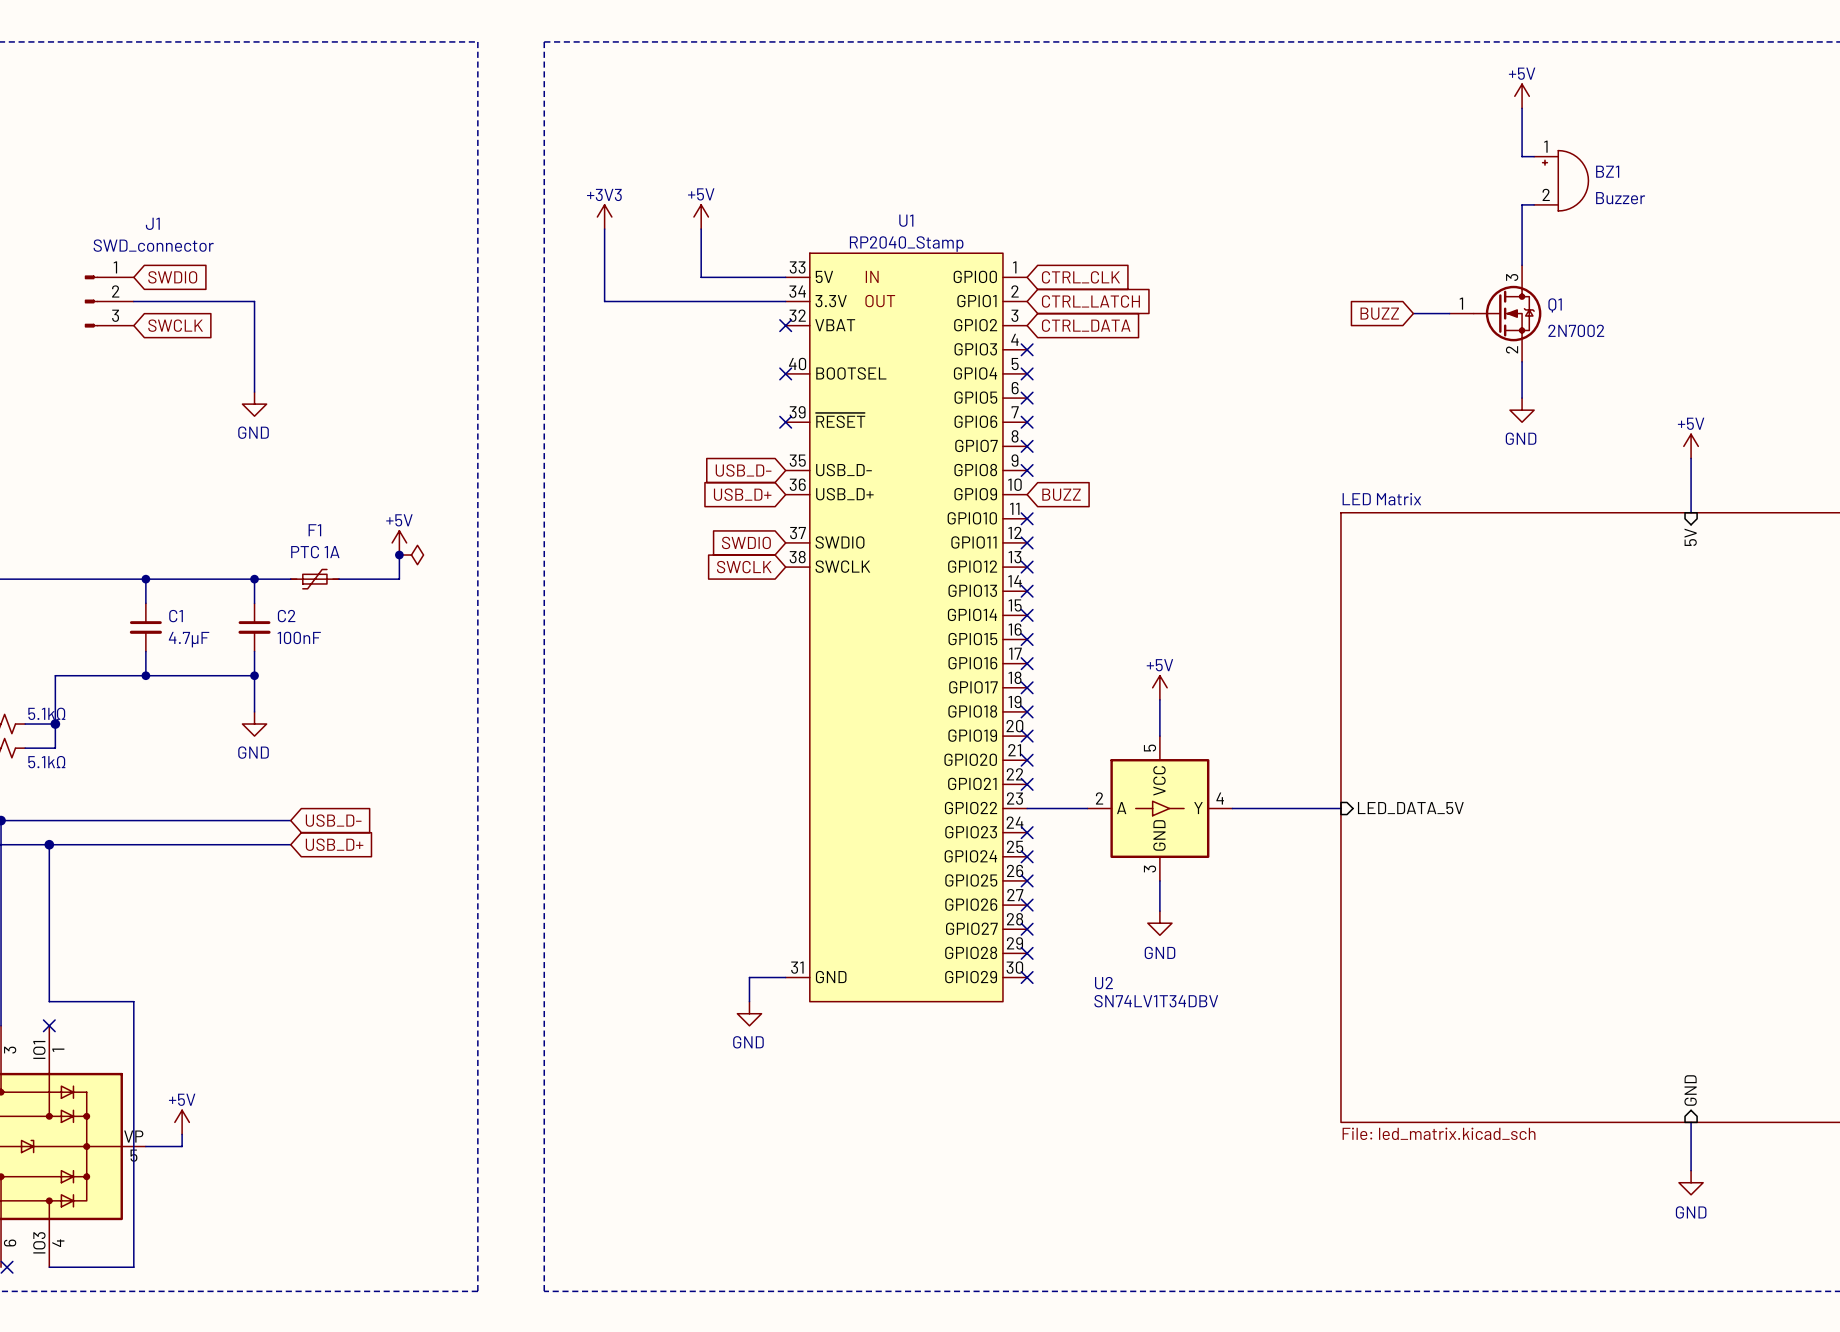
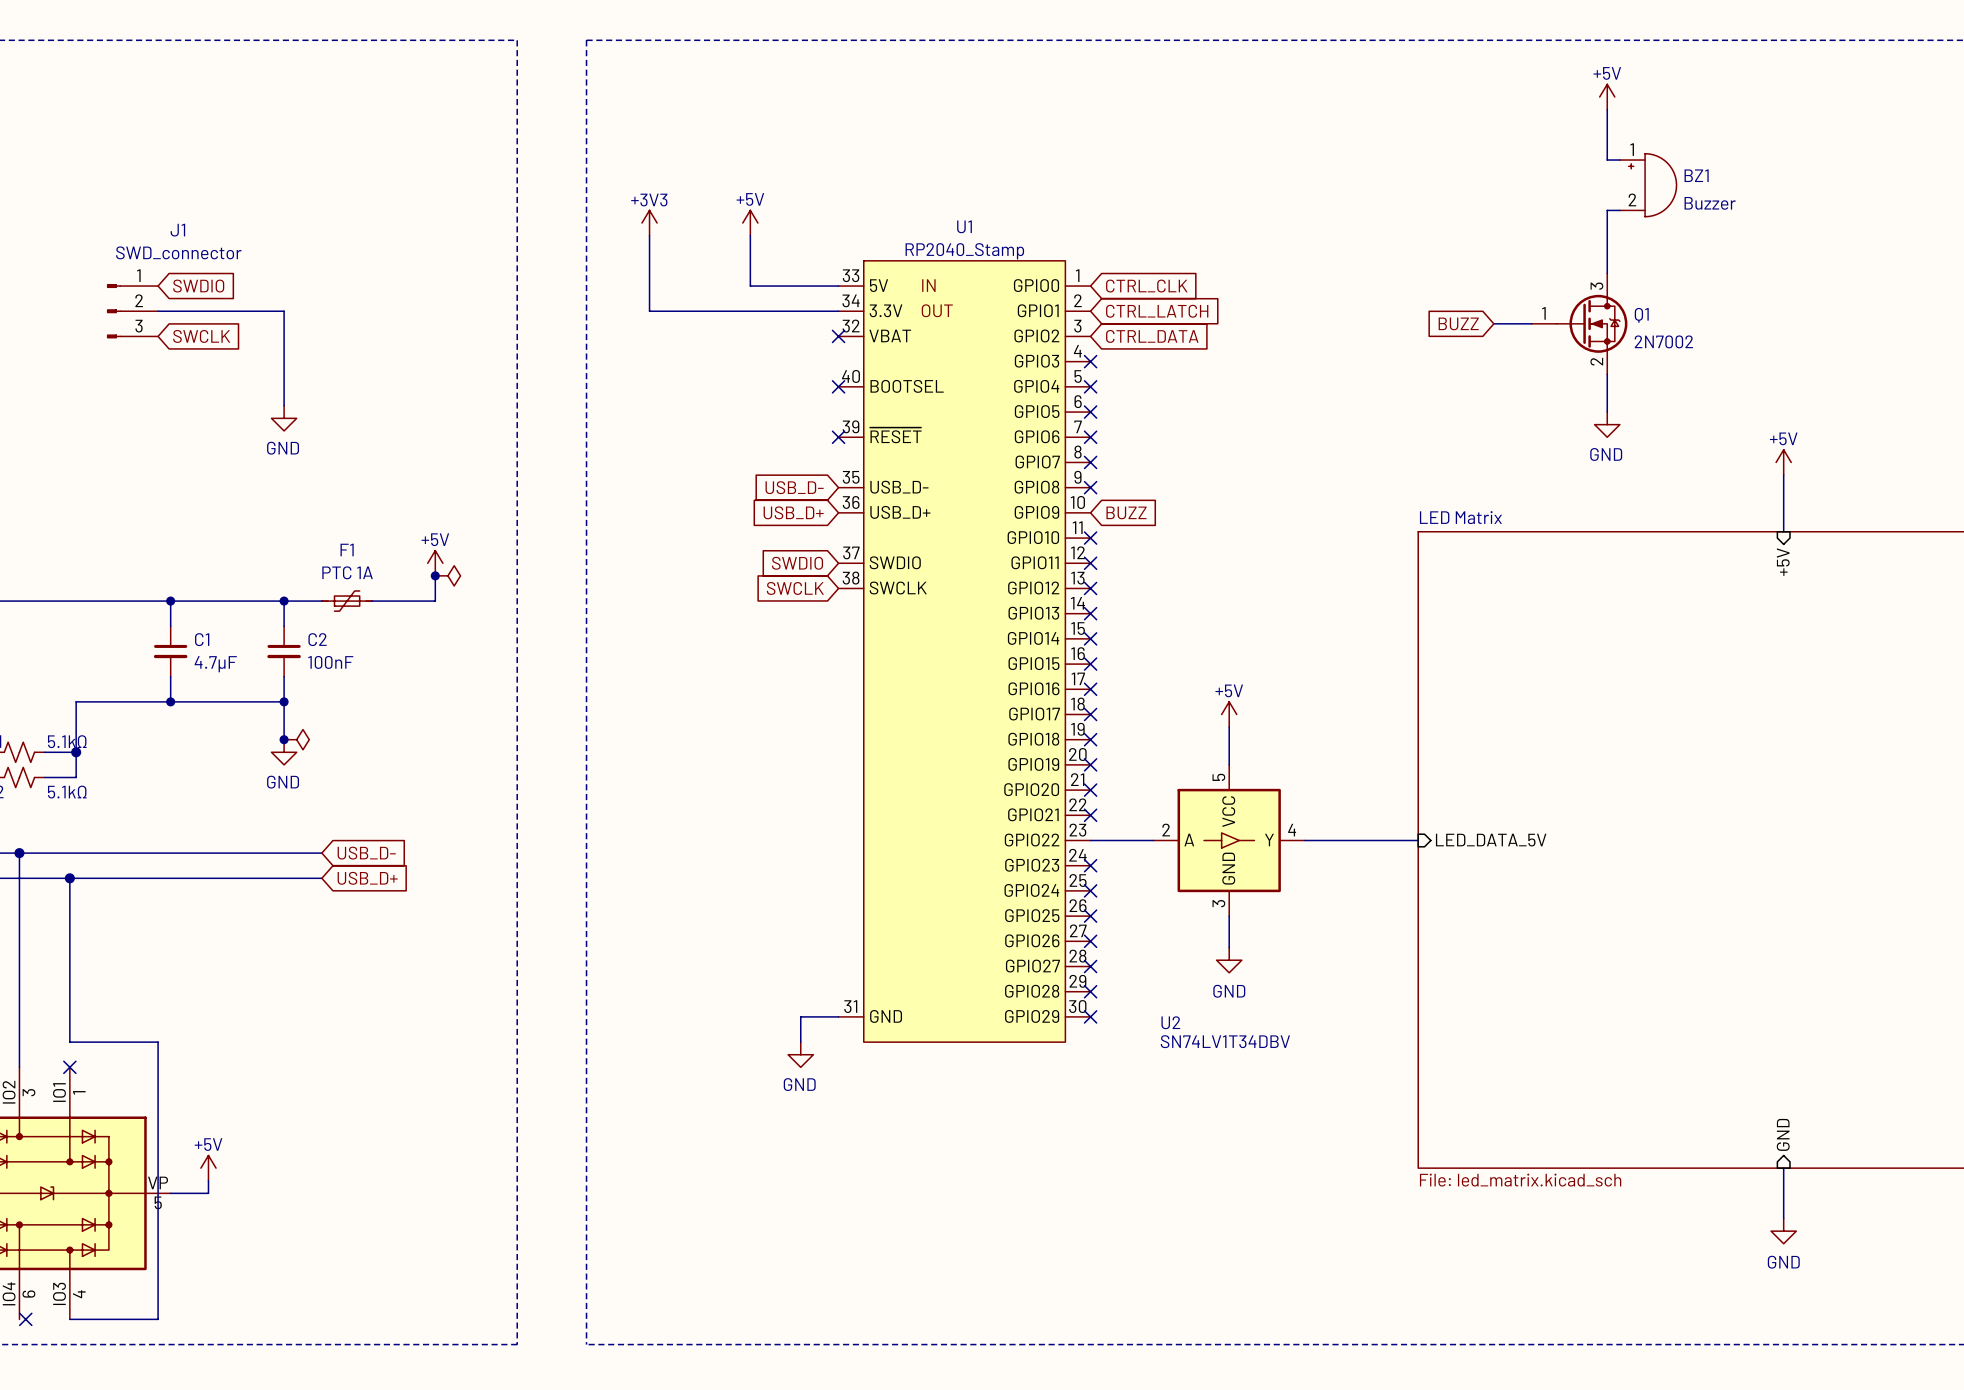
sheet pin: 5V (1690, 537) -> +5V (1783, 562)
junction: none -> (284, 739)
power symbol: none -> (296, 739)

